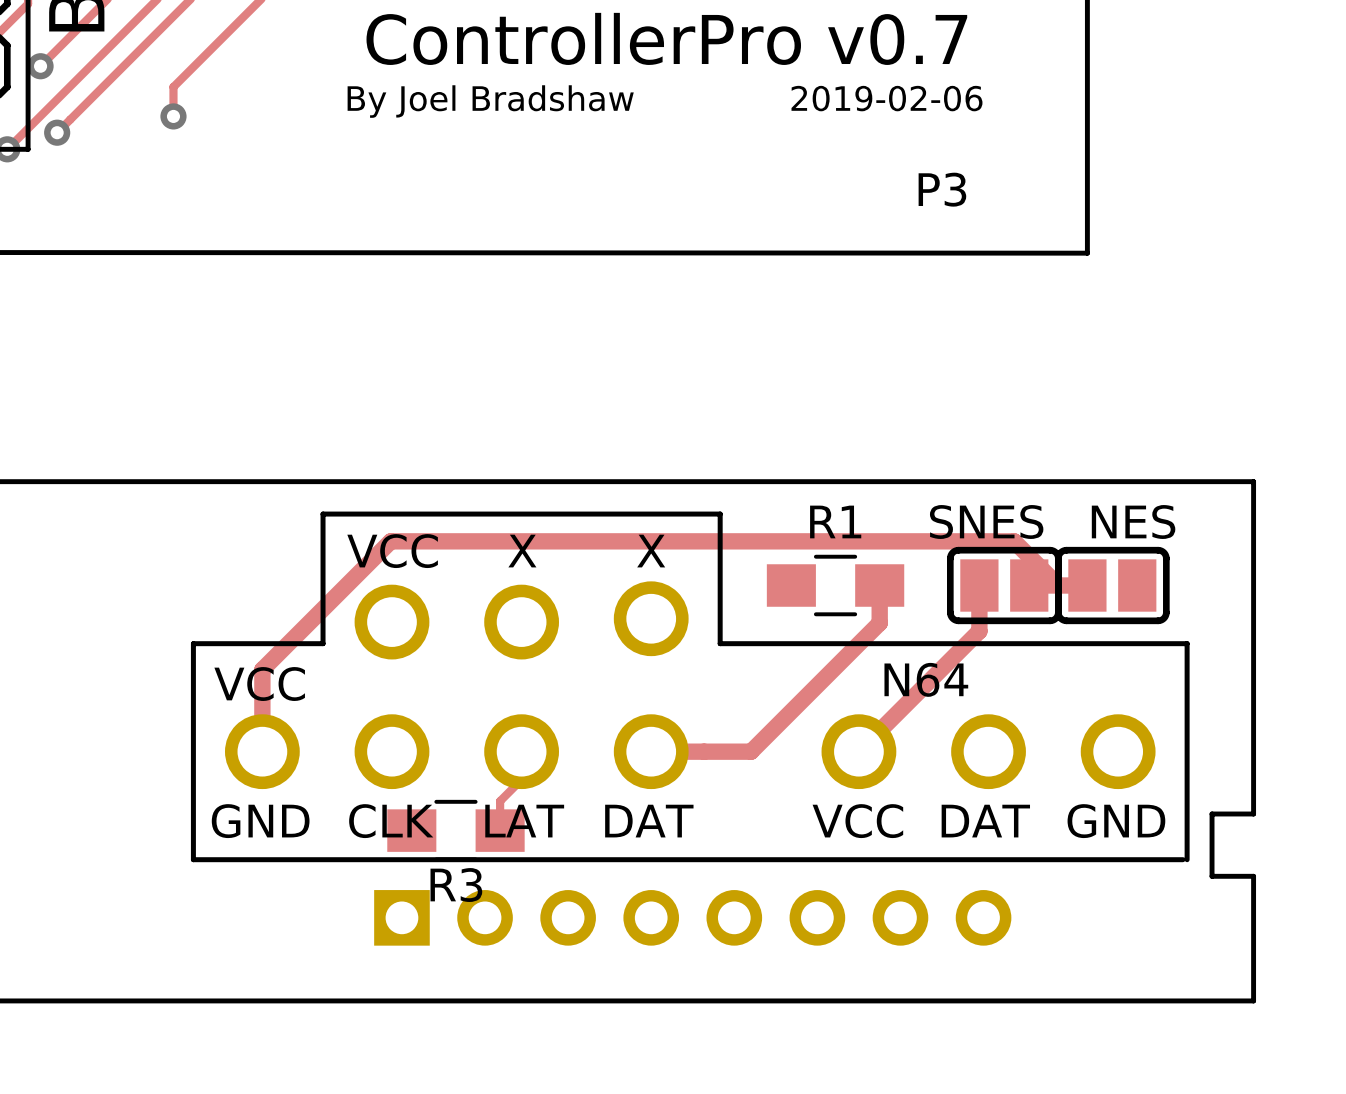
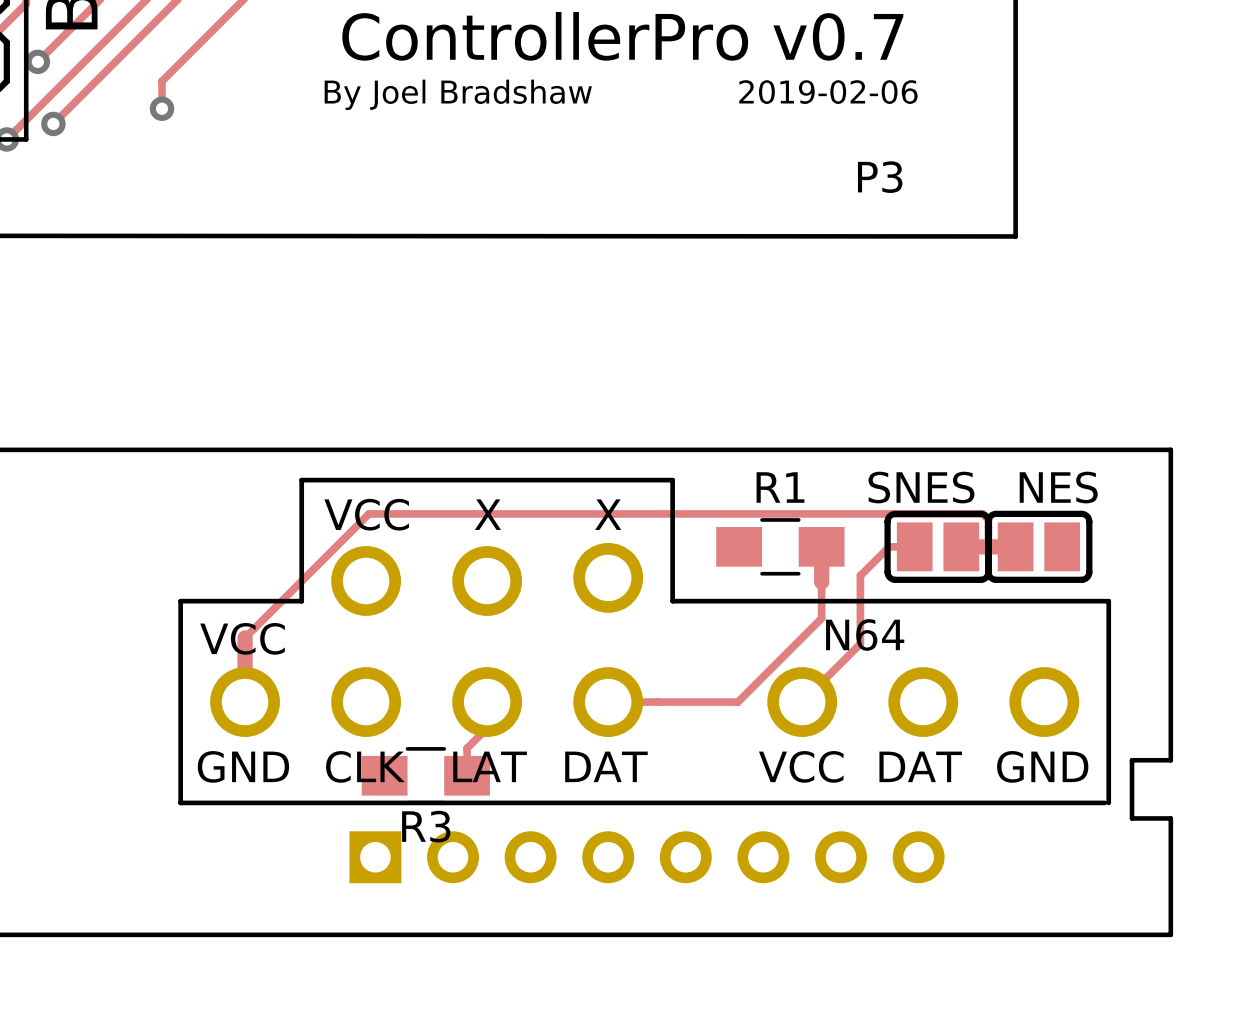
track: (979, 585) (979, 631) (921, 689) -> (914, 546) (889, 546) (860, 575) (860, 643)
track: (1058, 585) (1014, 541) (390, 541) (262, 669) (262, 682) -> (988, 546) (988, 519) (982, 513) (368, 513) (245, 637)
track: (879, 623) (751, 751) -> (821, 581) (821, 618) (737, 702) (701, 702)
track width: thick (921, 689) (858, 751) -> thin (860, 643) (802, 702)
track width: thick (651, 751) (751, 751) -> thin (608, 702) (701, 702)

